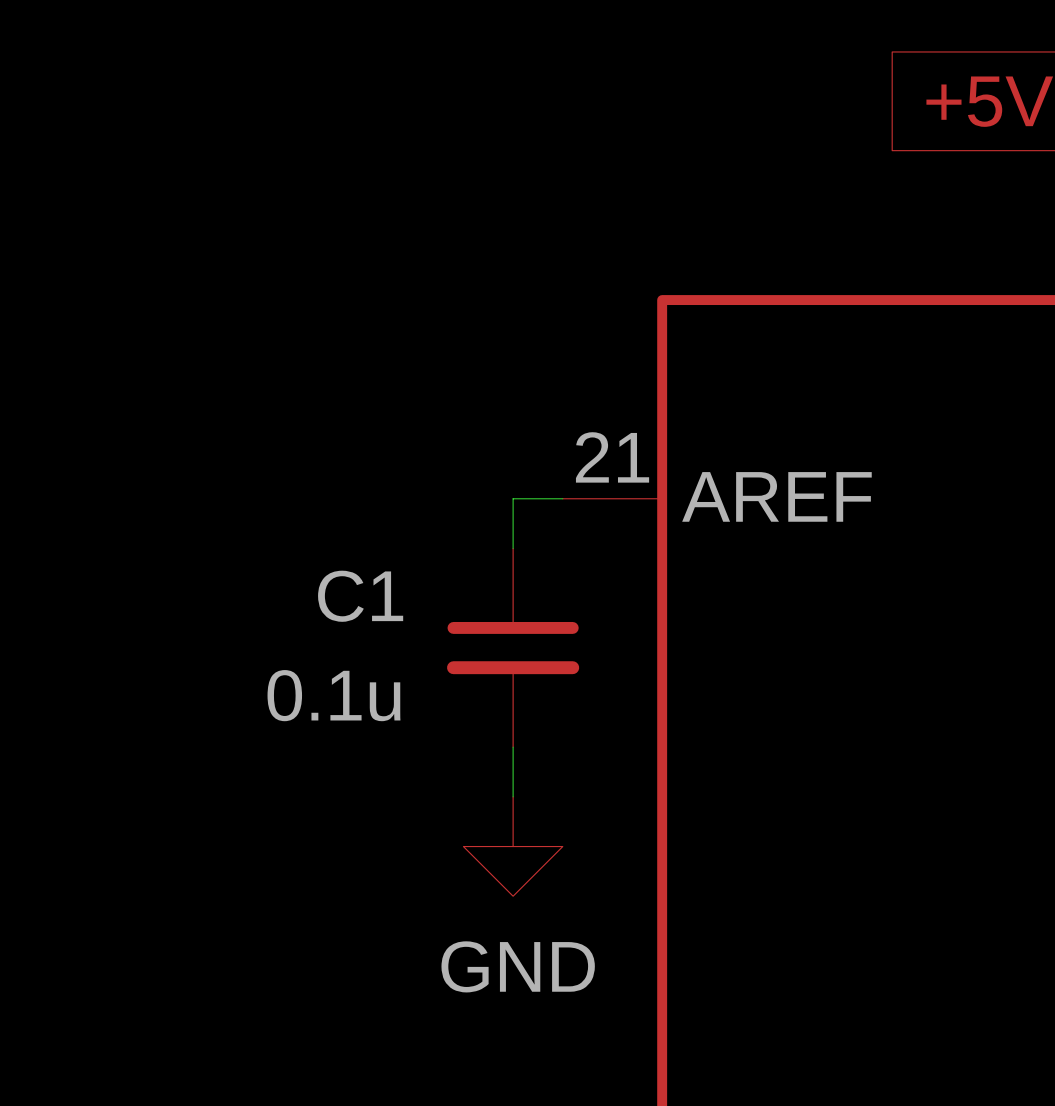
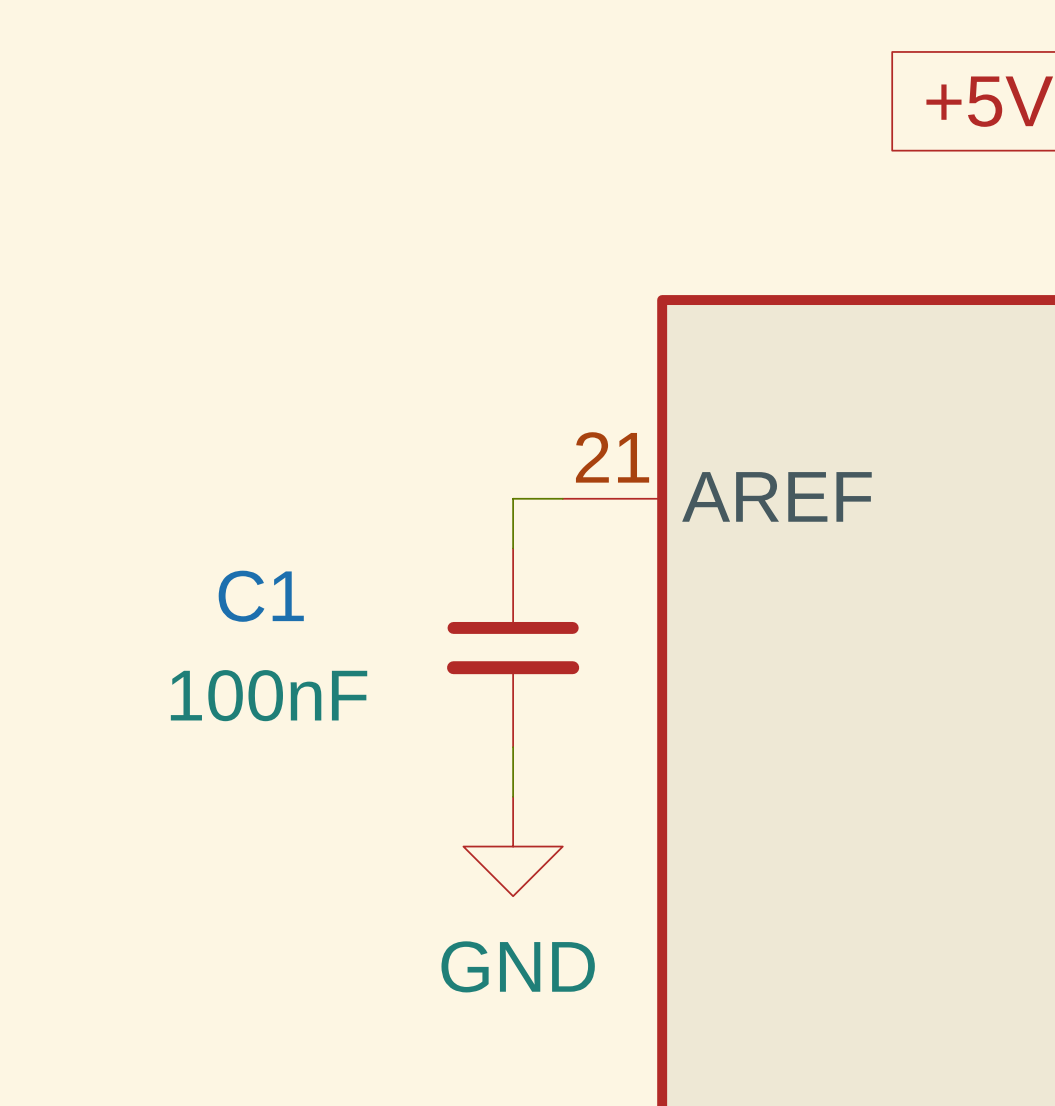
C1 name position: C1 (360, 596) -> C1 (261, 596)
C1 value: 0.1u (333, 695) -> 100nF (269, 695)

